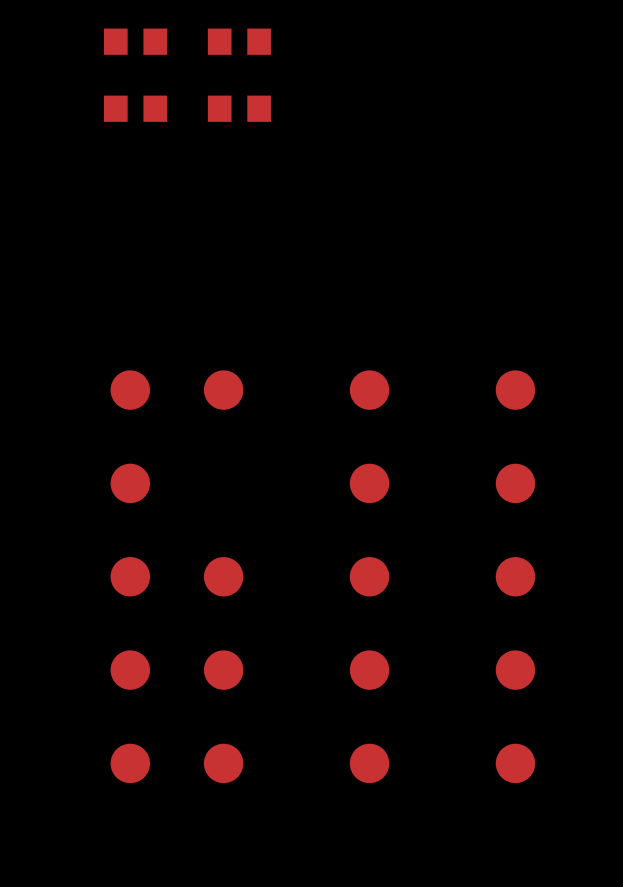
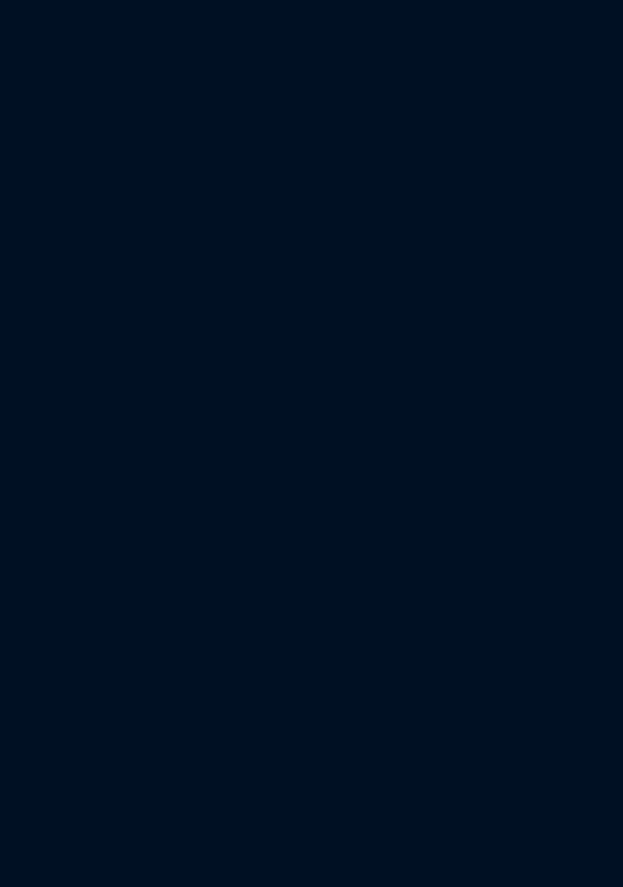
part: (135, 41) -> none
part: (239, 41) -> none
part: (135, 108) -> none
part: (239, 108) -> none
part: (130, 390) -> none
part: (223, 390) -> none
part: (369, 390) -> none
part: (515, 390) -> none
part: (130, 483) -> none
part: (369, 483) -> none
part: (515, 483) -> none
part: (130, 576) -> none
part: (223, 576) -> none
part: (369, 576) -> none
part: (515, 576) -> none
part: (130, 670) -> none
part: (223, 670) -> none
part: (369, 670) -> none
part: (515, 670) -> none
part: (130, 763) -> none
part: (223, 763) -> none
part: (369, 763) -> none
part: (515, 763) -> none

